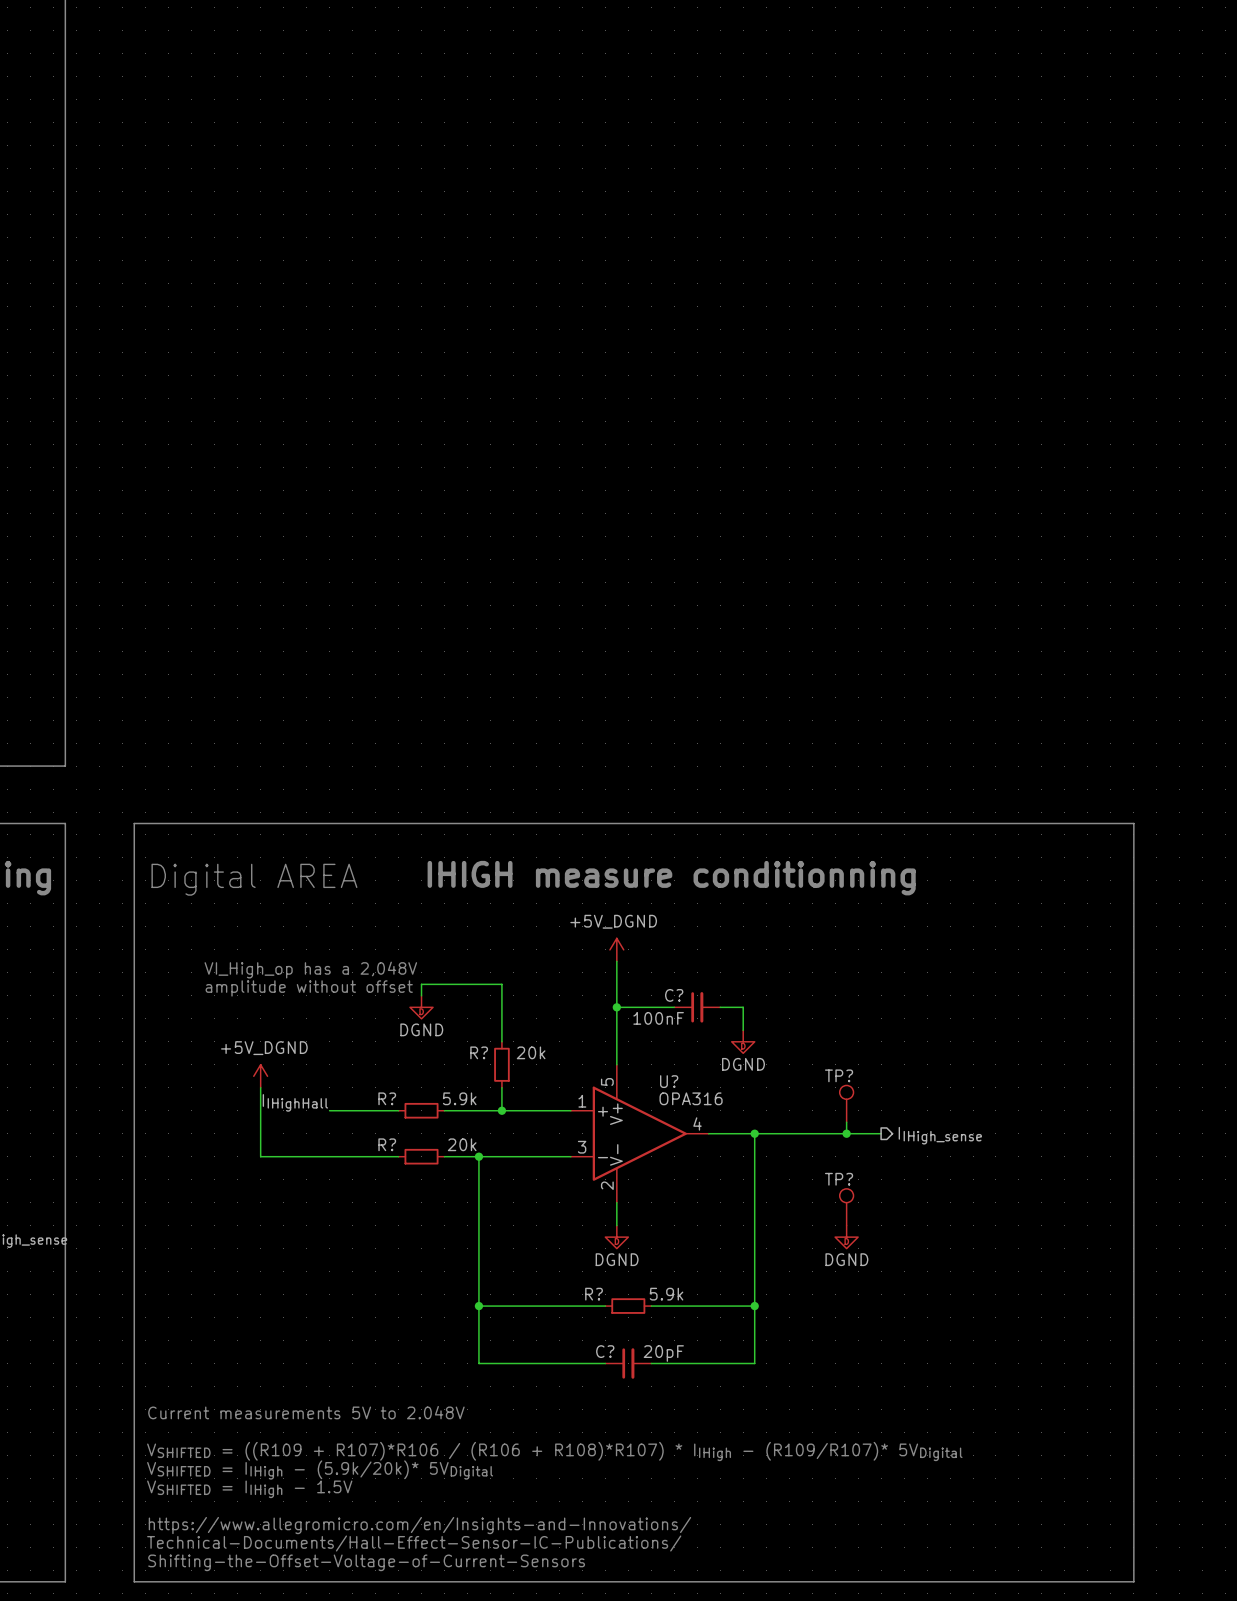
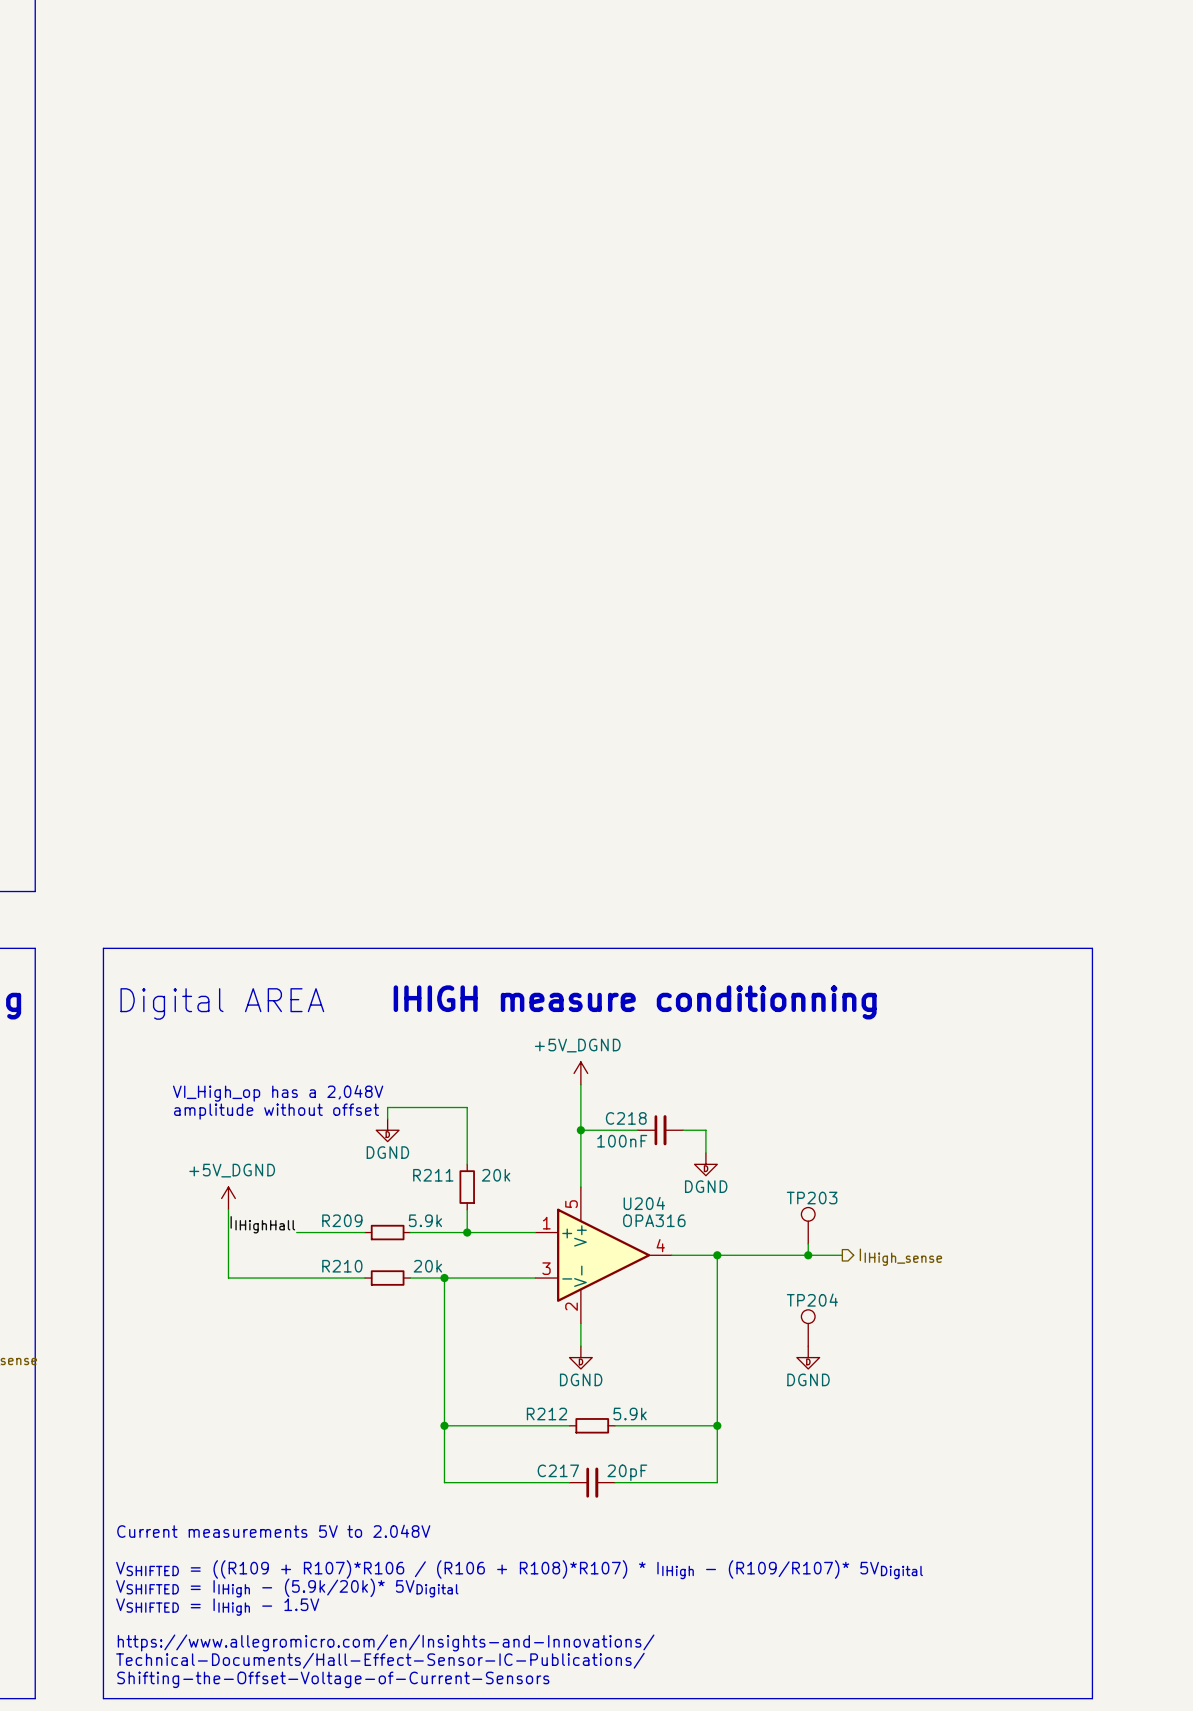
C? name: C? (674, 995) -> C218 (626, 1118)
R? name: R? (479, 1052) -> R211 (433, 1175)
TP? name: TP? (839, 1075) -> TP203 (812, 1198)
U? name: U? (669, 1081) -> U204 (644, 1203)
R? name: R? (387, 1098) -> R209 (342, 1220)
R? name: R? (387, 1144) -> R210 (342, 1266)
TP? name: TP? (839, 1179) -> TP204 (812, 1300)
R? name: R? (594, 1294) -> R212 (546, 1414)
C? name: C? (605, 1351) -> C217 (558, 1470)

